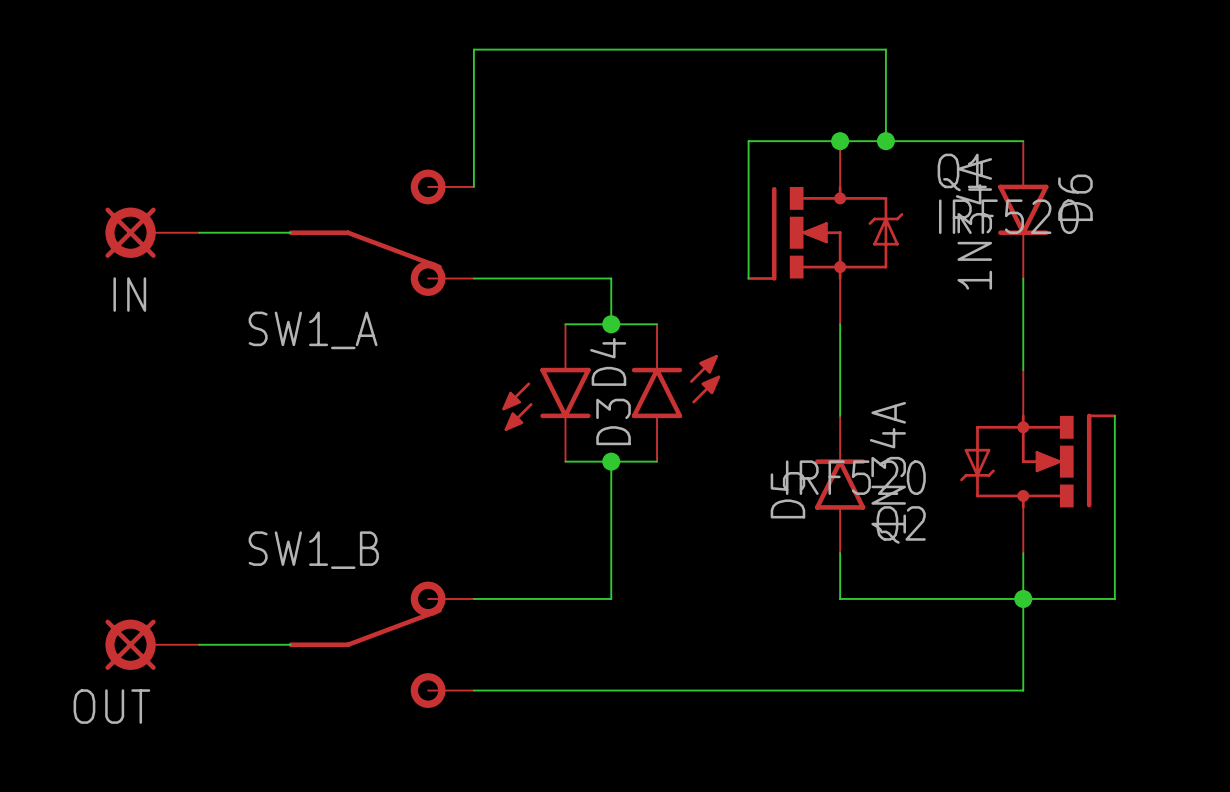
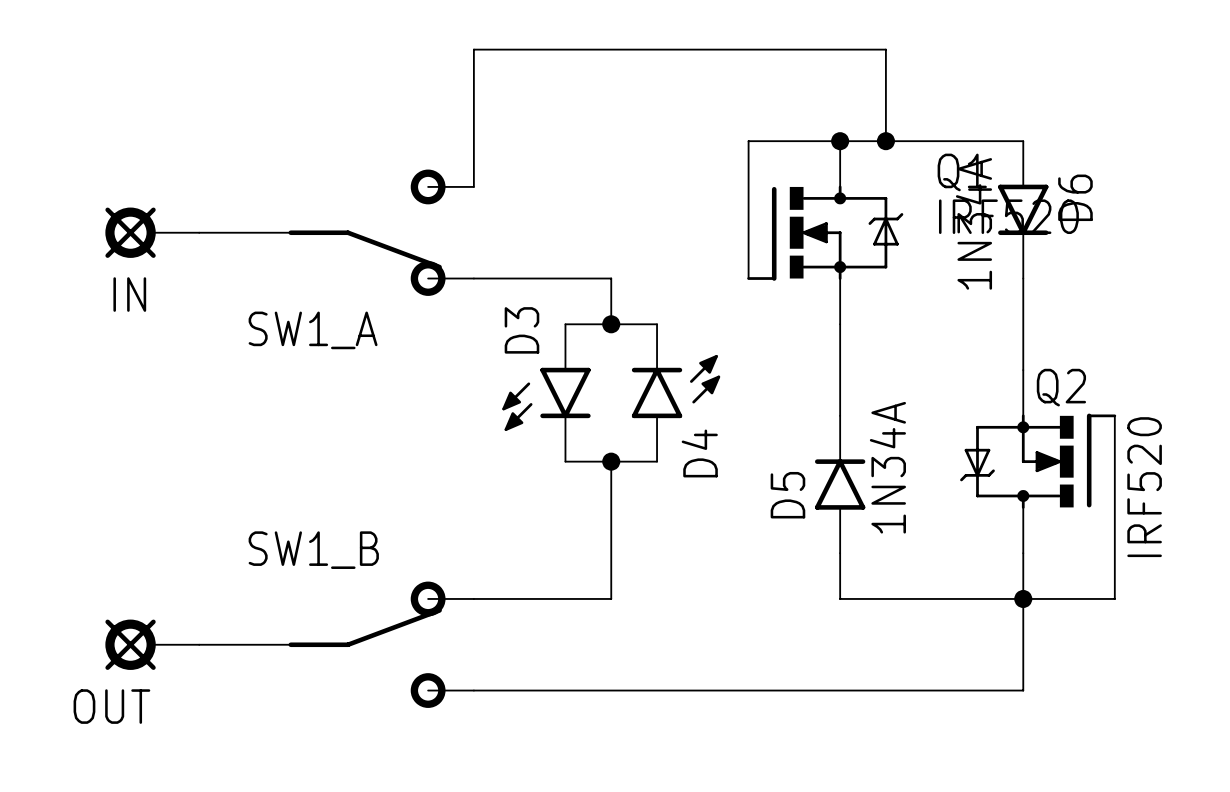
D4 name position: D4 (608, 361) -> D4 (699, 453)
D3 name position: D3 (613, 421) -> D3 (521, 330)
Q2 value rotation: 0° (855, 477) -> 90° counterclockwise (1144, 487)
Q2 value position: IRF520 (855, 477) -> IRF520 (1144, 487)
Q2 name position: Q2 (901, 524) -> Q2 (1061, 387)

